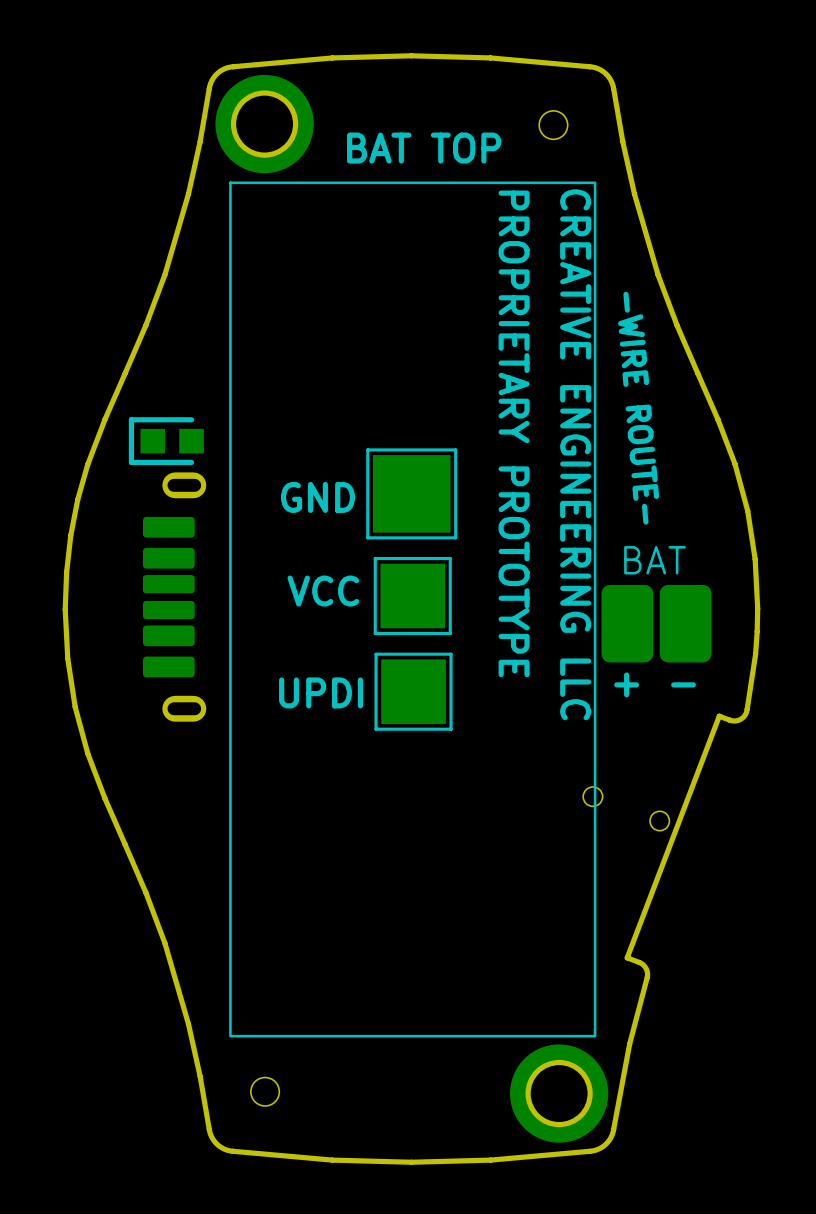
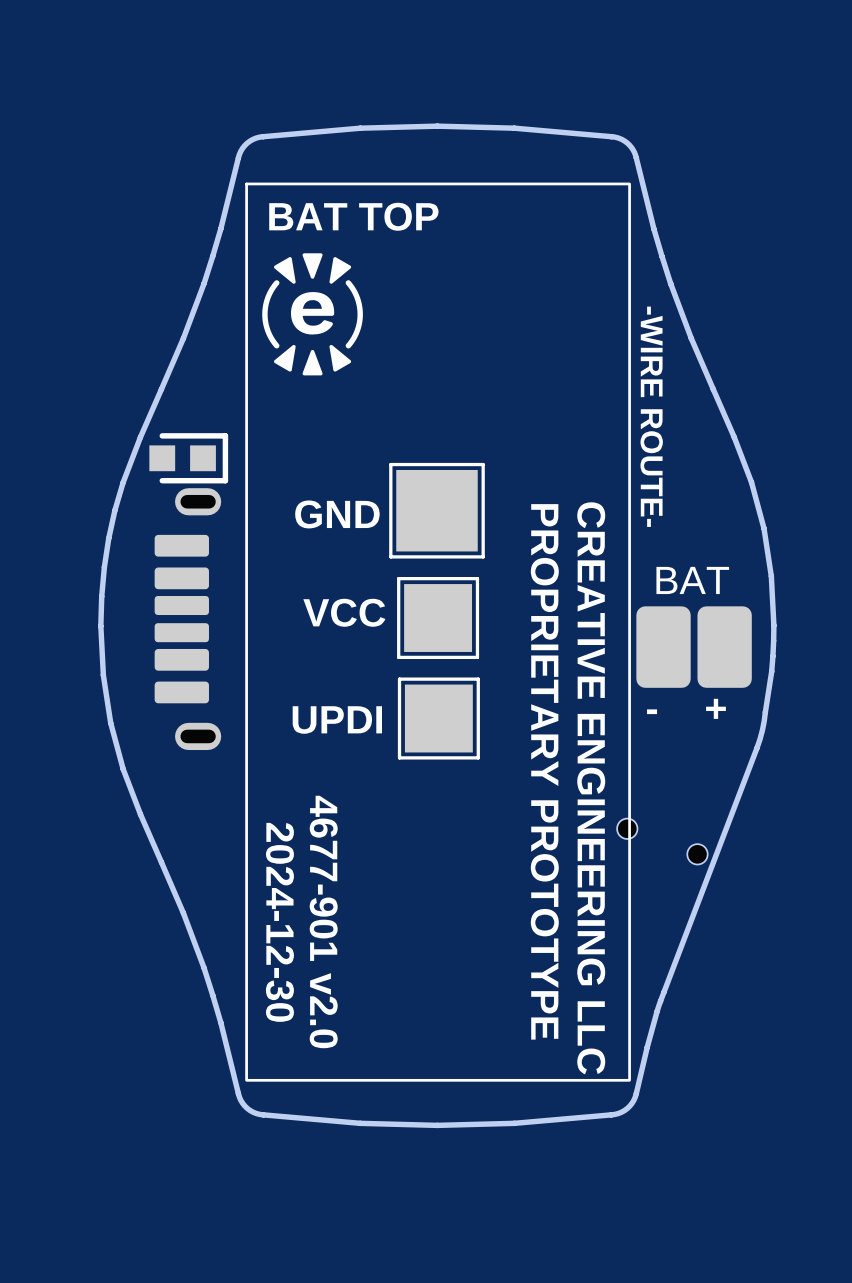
board edge: (411, 55) (332, 57) (230, 67) (219, 71) (212, 80) (188, 194) (164, 275) (145, 325) (104, 419) (87, 464) (77, 499) (70, 535) (65, 609) (67, 658) (75, 706) (87, 753) (164, 942) (188, 1024) (209, 1132) (217, 1144) (233, 1151) (332, 1160) (411, 1162) (490, 1160) (592, 1150) (605, 1144) (613, 1132) (629, 1044) (647, 977) (646, 969) (643, 964) (627, 957) (719, 716) (737, 720) (743, 717) (746, 710) (755, 654) (757, 608) (755, 559) (747, 511) (735, 464) (658, 275) (634, 194) (613, 85) (609, 77) (600, 70) (589, 66) (490, 57) (411, 55) -> (437, 126) (514, 128) (611, 136) (621, 139) (629, 145) (635, 154) (653, 228) (670, 283) (691, 338) (751, 482) (764, 528) (771, 576) (773, 625) (771, 671) (762, 730) (658, 1006) (635, 1096) (627, 1108) (614, 1114) (514, 1123) (437, 1125) (360, 1123) (263, 1114) (247, 1108) (239, 1096) (220, 1022) (204, 968) (183, 913) (123, 769) (110, 723) (103, 675) (100, 626) (104, 567) (114, 510) (140, 437) (183, 338) (204, 283) (220, 228) (240, 151) (250, 141) (259, 137) (360, 128) (437, 126)
round board edge: [538, 110, 569, 140] -> none
part: (264, 124) -> none
text position: BAT TOP (424, 148) -> BAT TOP (353, 216)
drawing: none -> [262, 253, 363, 376]
text rotation: 0° (638, 408) -> 5° clockwise (651, 416)
text position: PROPRIETARY PROTOTYPE (514, 433) -> PROPRIETARY PROTOTYPE (544, 771)
part rotation: 0° (166, 441) -> 180° (188, 458)
text position: CREATIVE ENGINEERING LLC (575, 454) -> CREATIVE ENGINEERING LLC (591, 788)
text: + (626, 684) -> - (652, 711)
text: - (683, 684) -> + (715, 708)
text: none -> 2024-12-30 (279, 922)
text: none -> 4677-901 v2.0 (323, 922)
round board edge: [250, 1076, 280, 1107] -> none
part: (559, 1093) -> none

